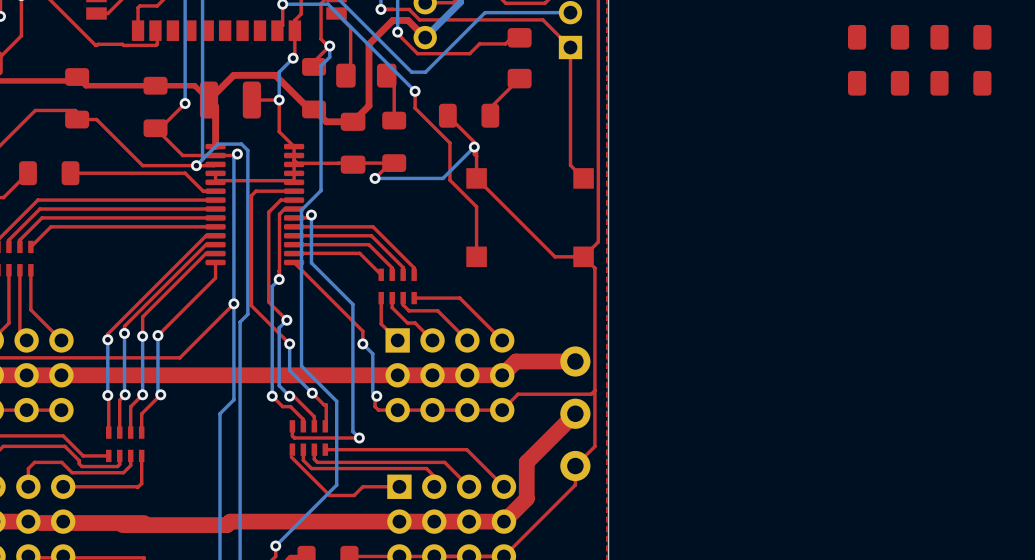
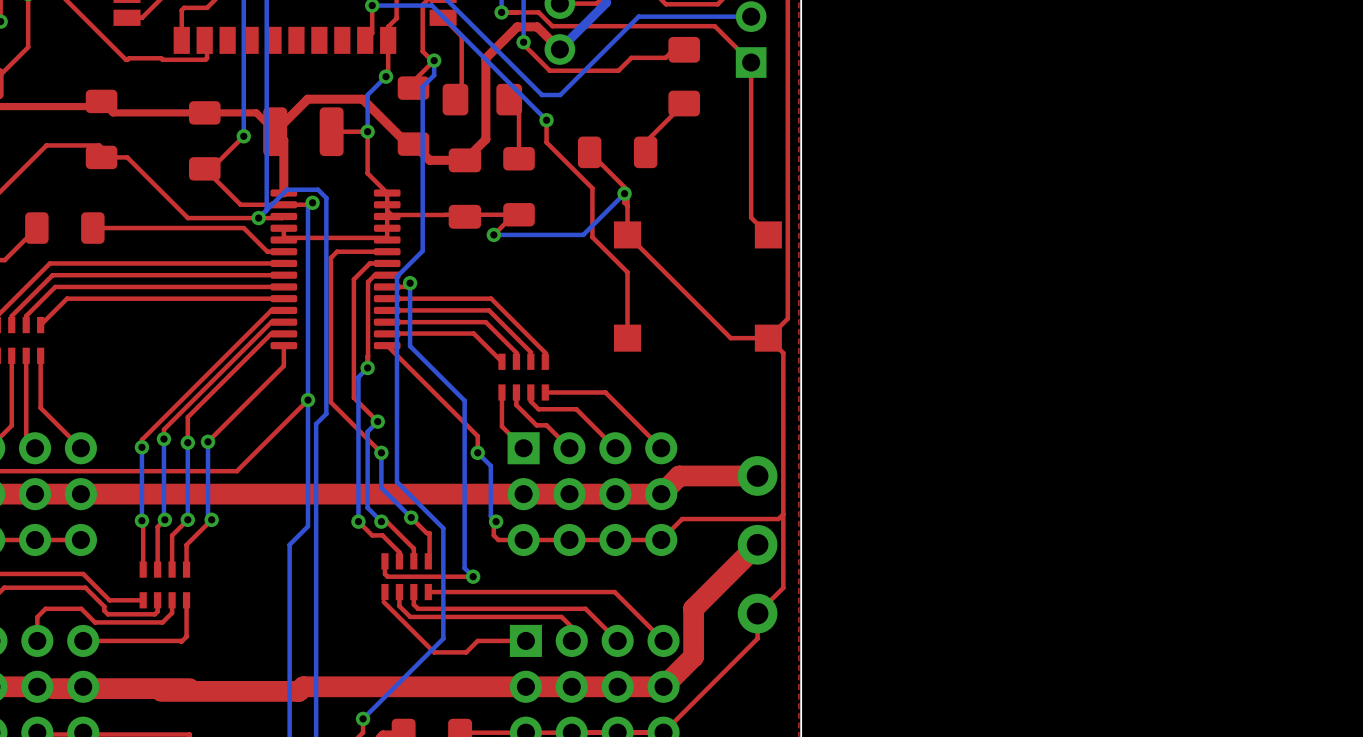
part: (878, 37) -> none
part: (960, 37) -> none
part: (878, 83) -> none
part: (960, 83) -> none

